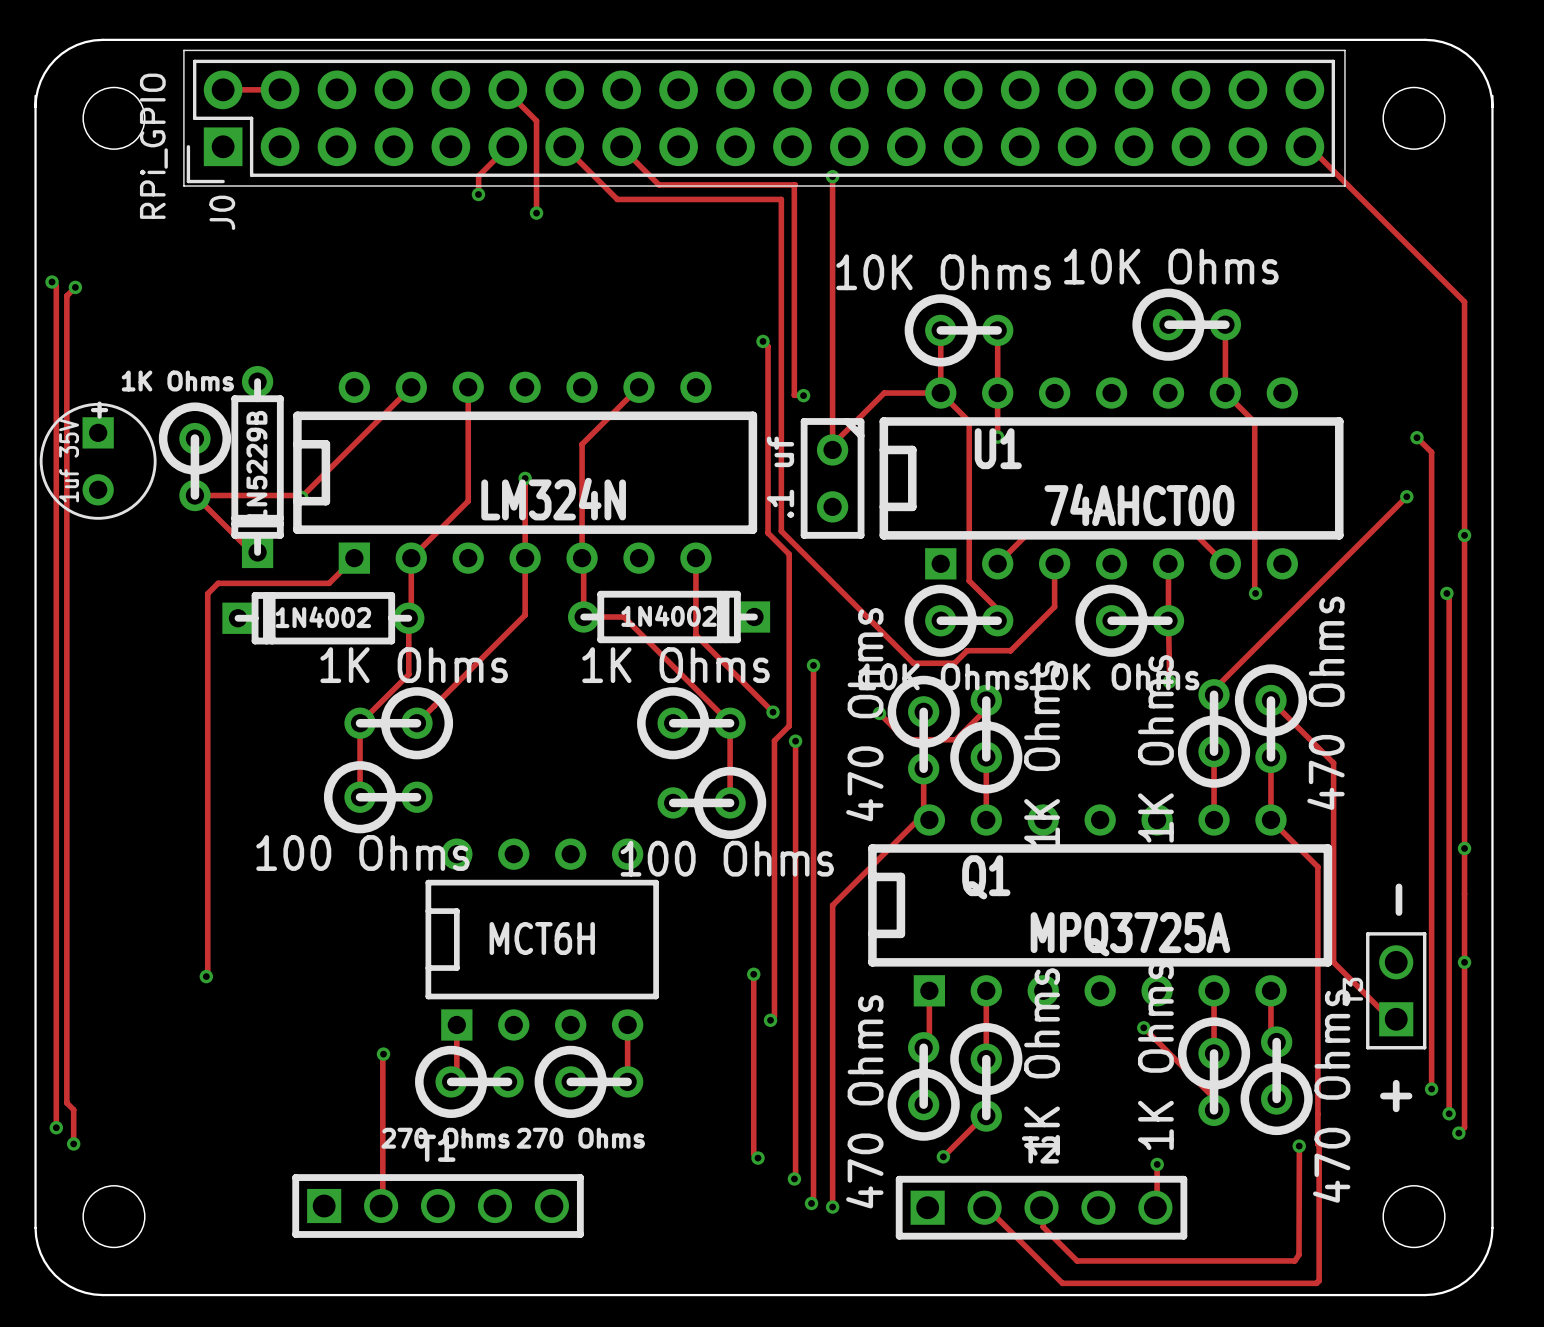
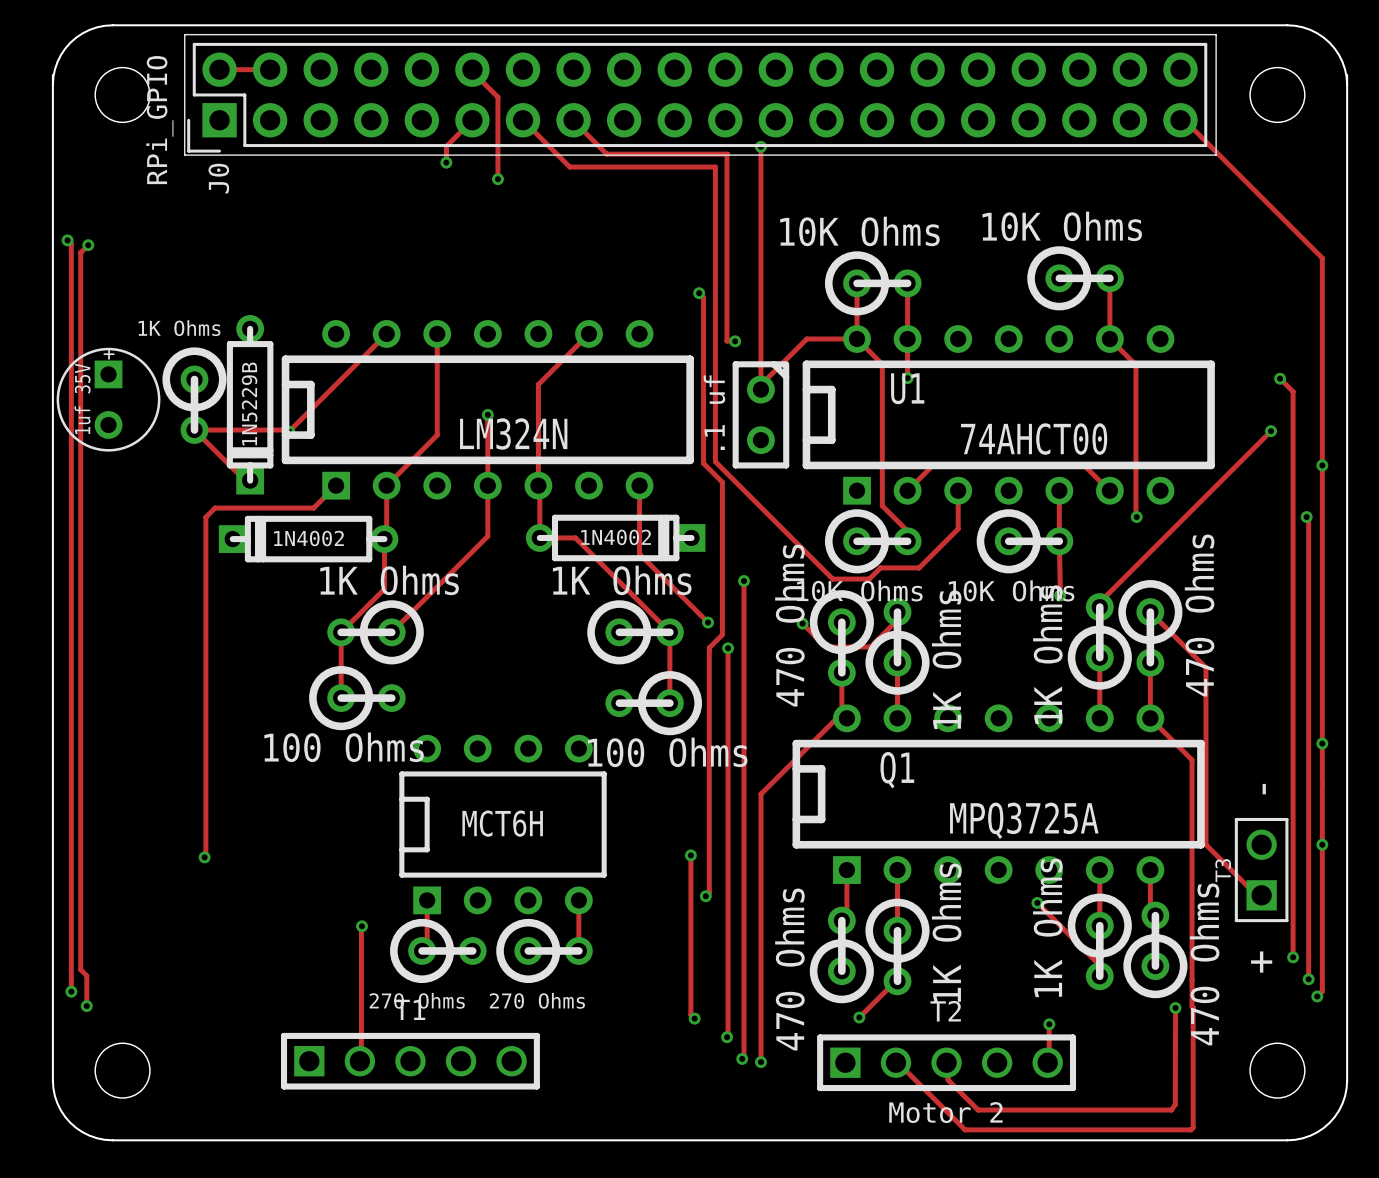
T2 value: none -> Motor 2 (945, 1112)

